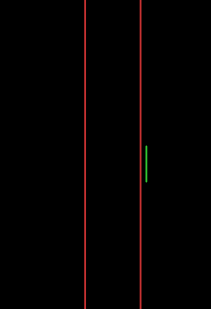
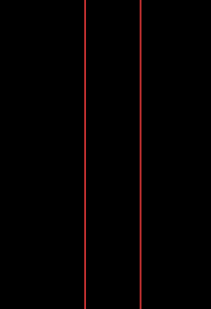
wire: (146, 146) (146, 181) -> none

